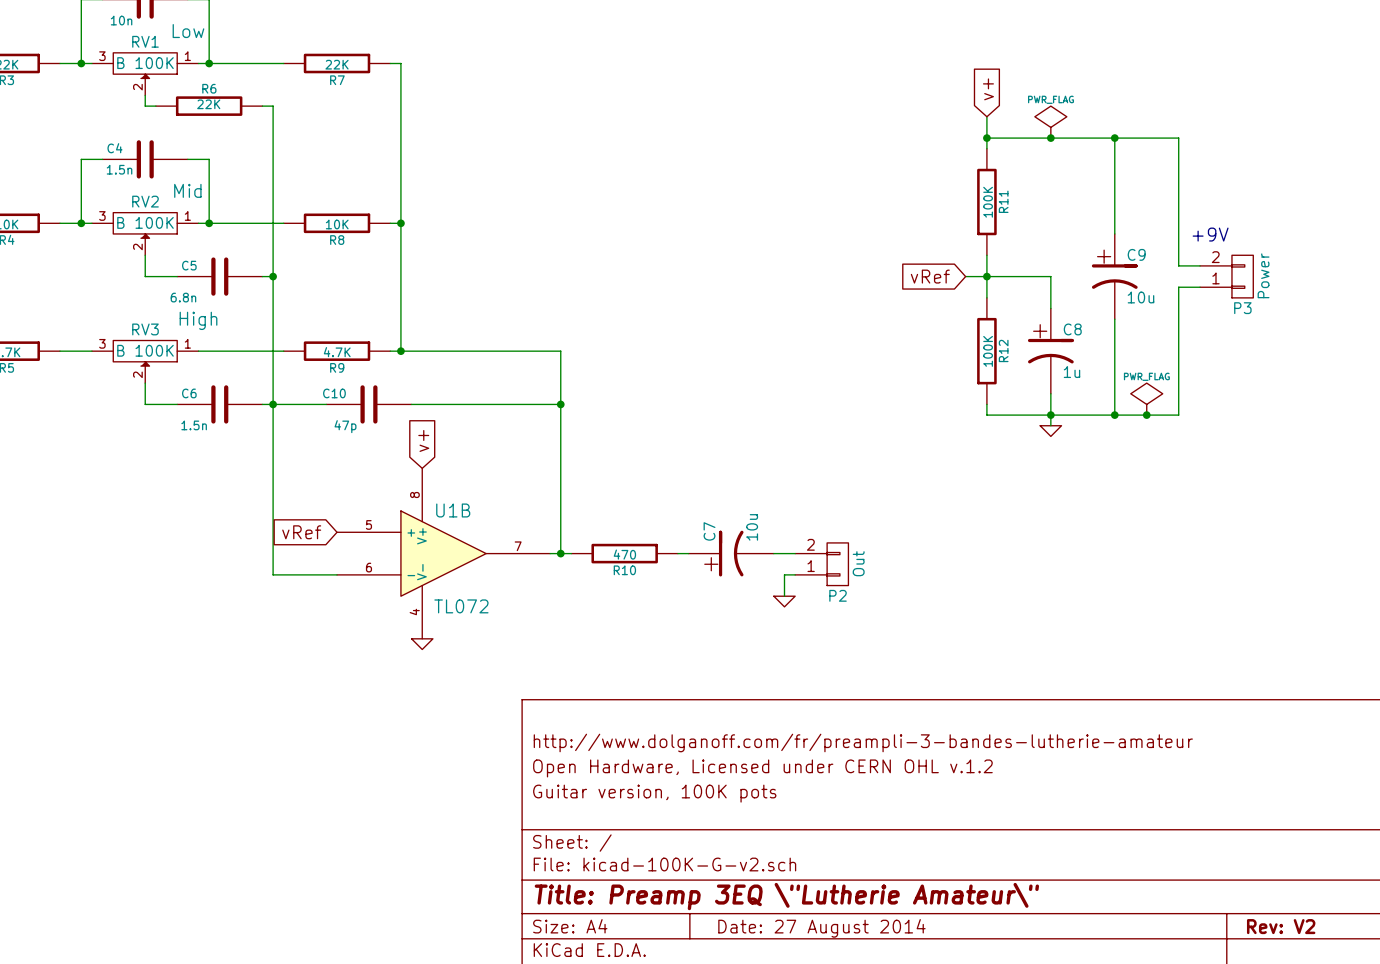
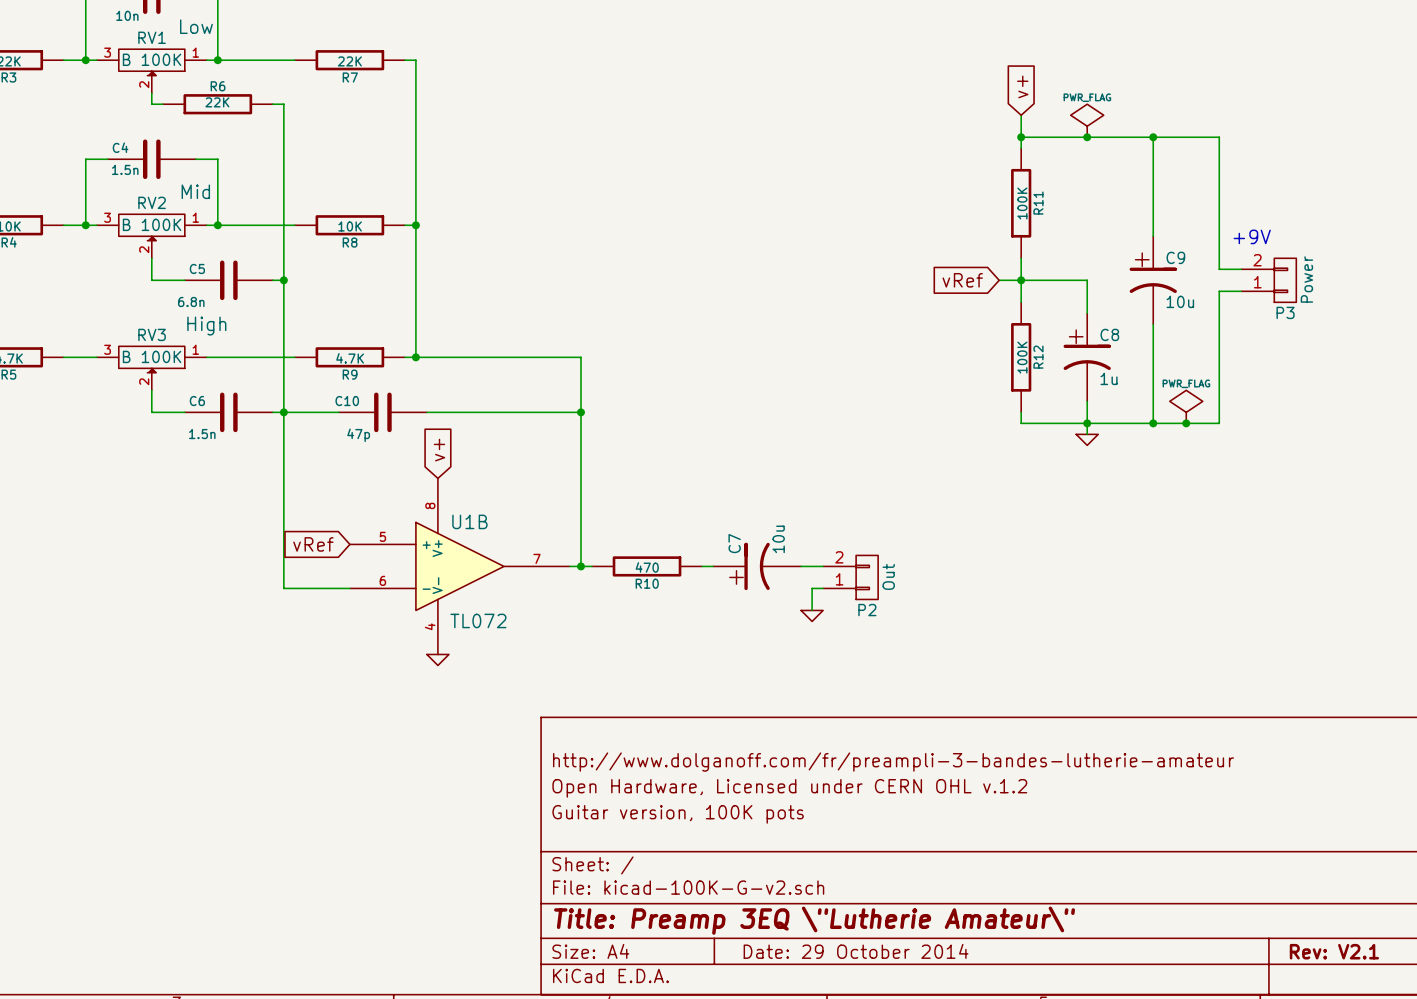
title block: Rev: V2 (1281, 926) -> Rev: V2.1 (1334, 951)
title block: Date: 27 August 2014 (821, 928) -> Date: 29 October 2014 (856, 951)

